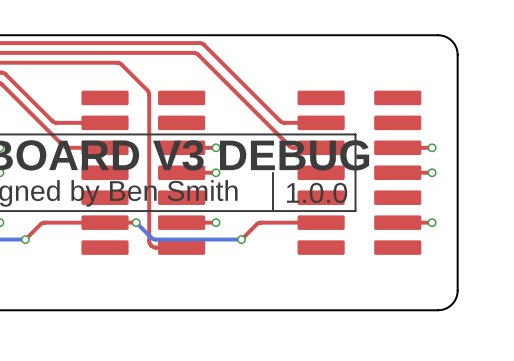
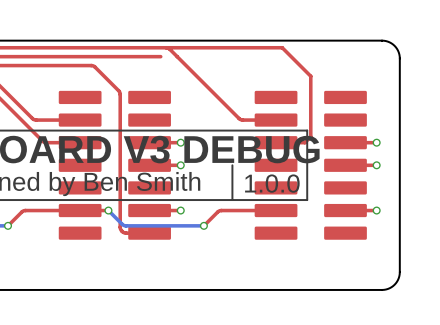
top track: (193, 52) (198, 54) (289, 146) (321, 147) -> (166, 47) (282, 47) (310, 76) (310, 136) (304, 142) (276, 142)

